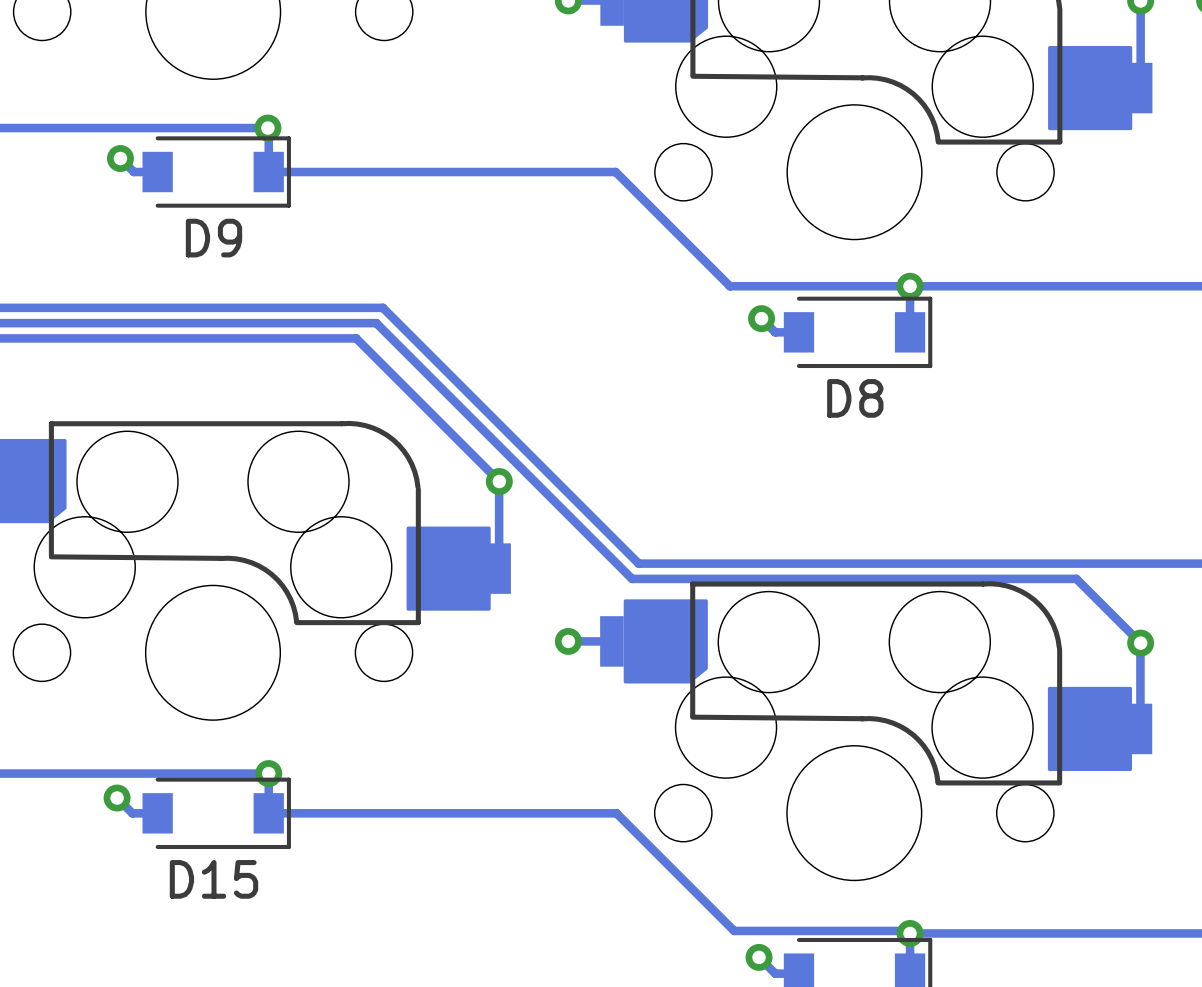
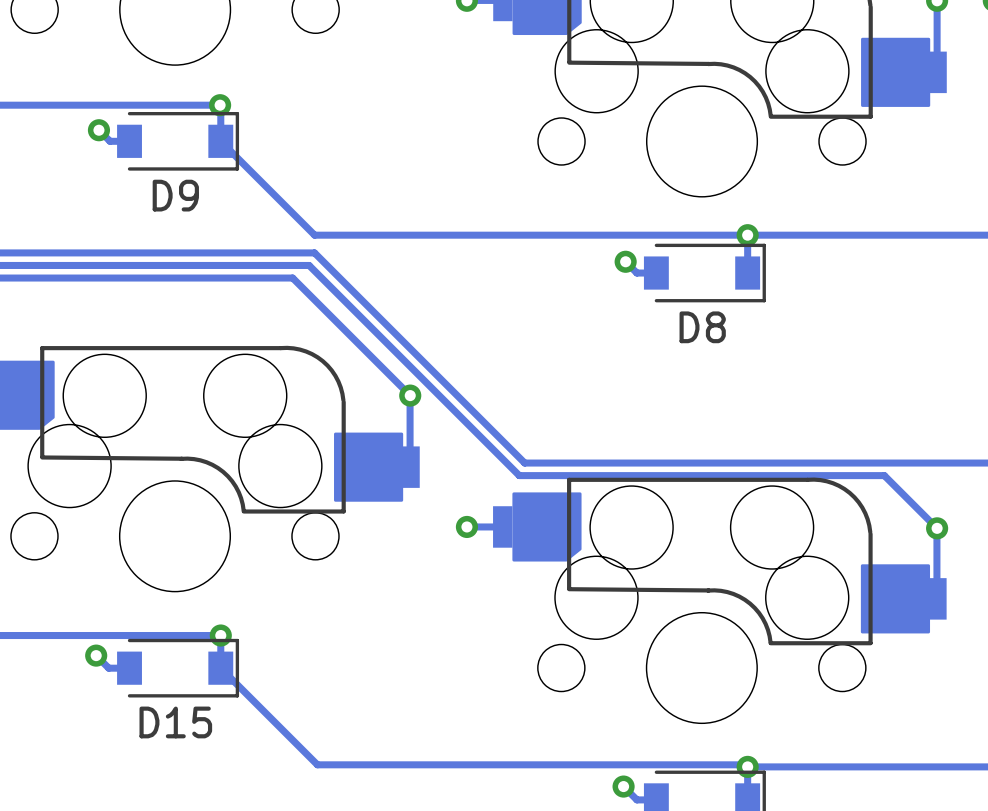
track: (268, 172) (615, 172) (729, 286) -> (220, 141) (314, 235) (599, 235)
track: (268, 813) (616, 813) (734, 930) -> (220, 668) (317, 764) (603, 764)

